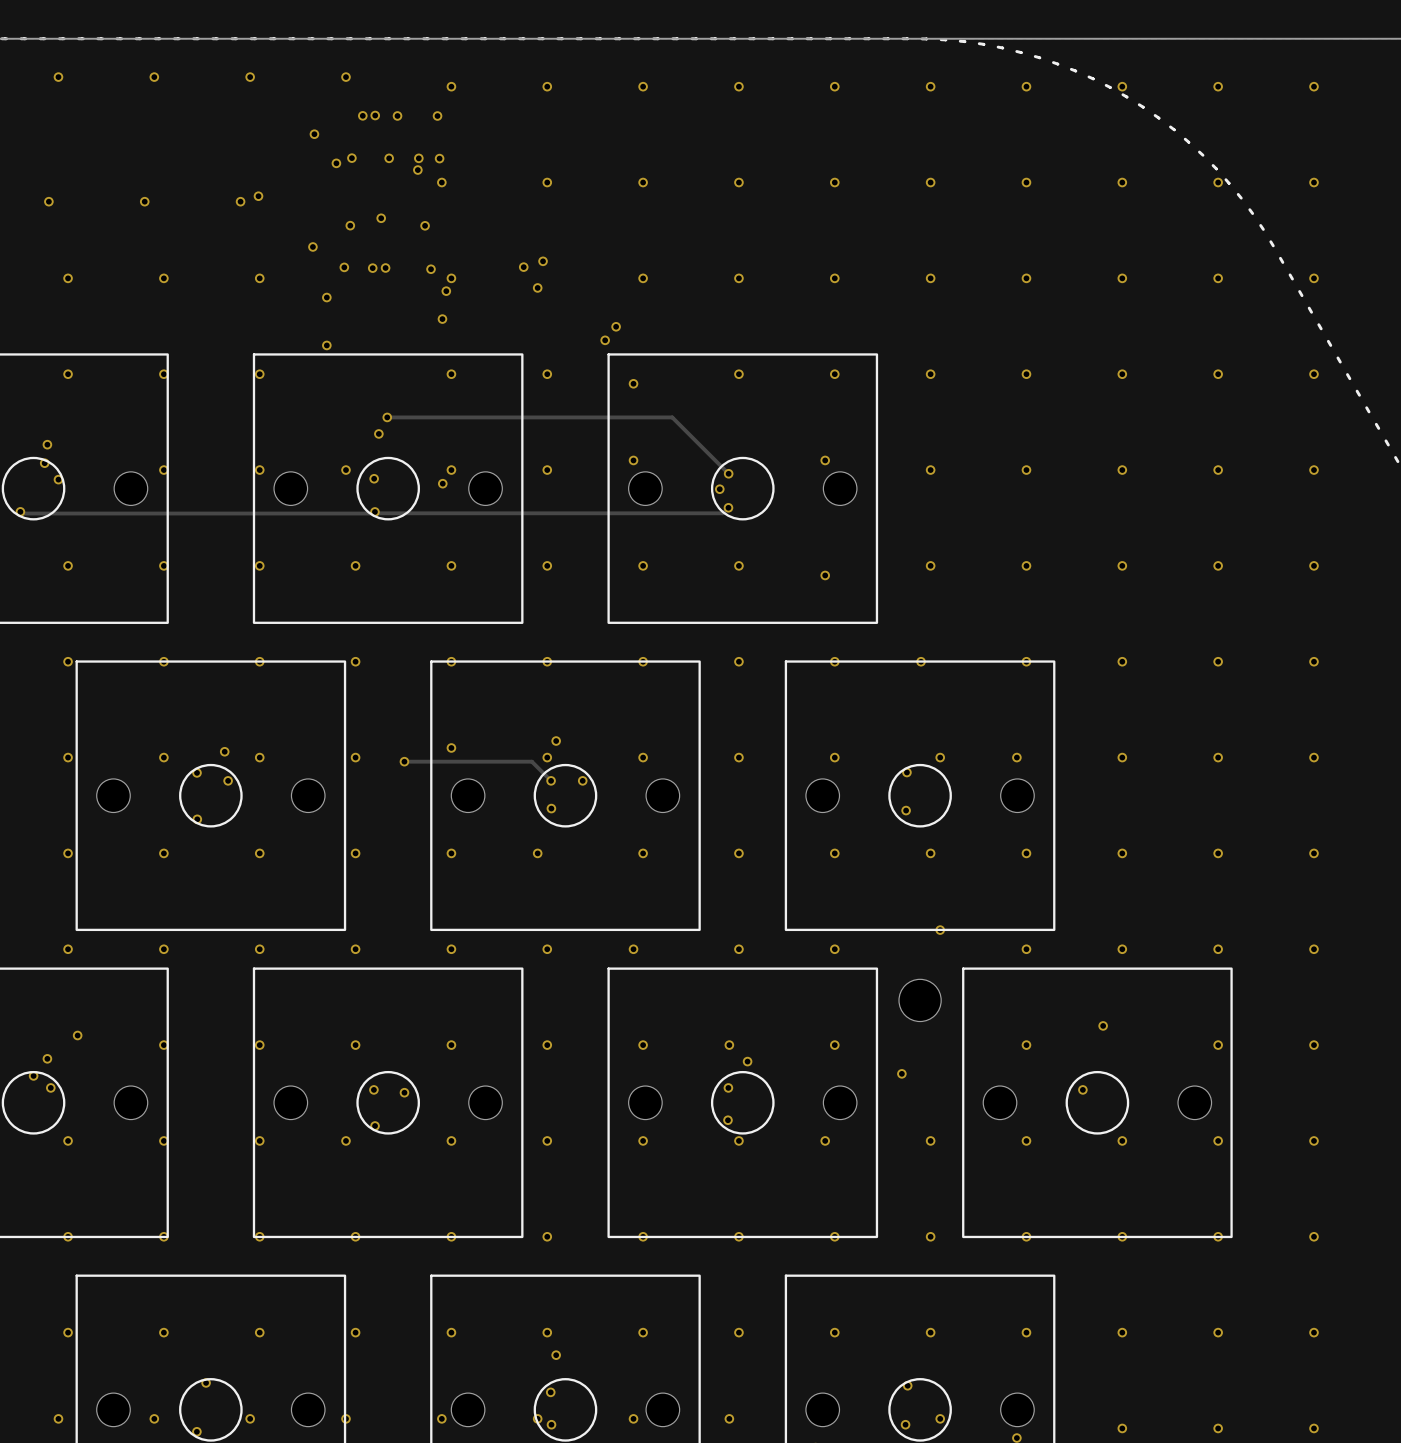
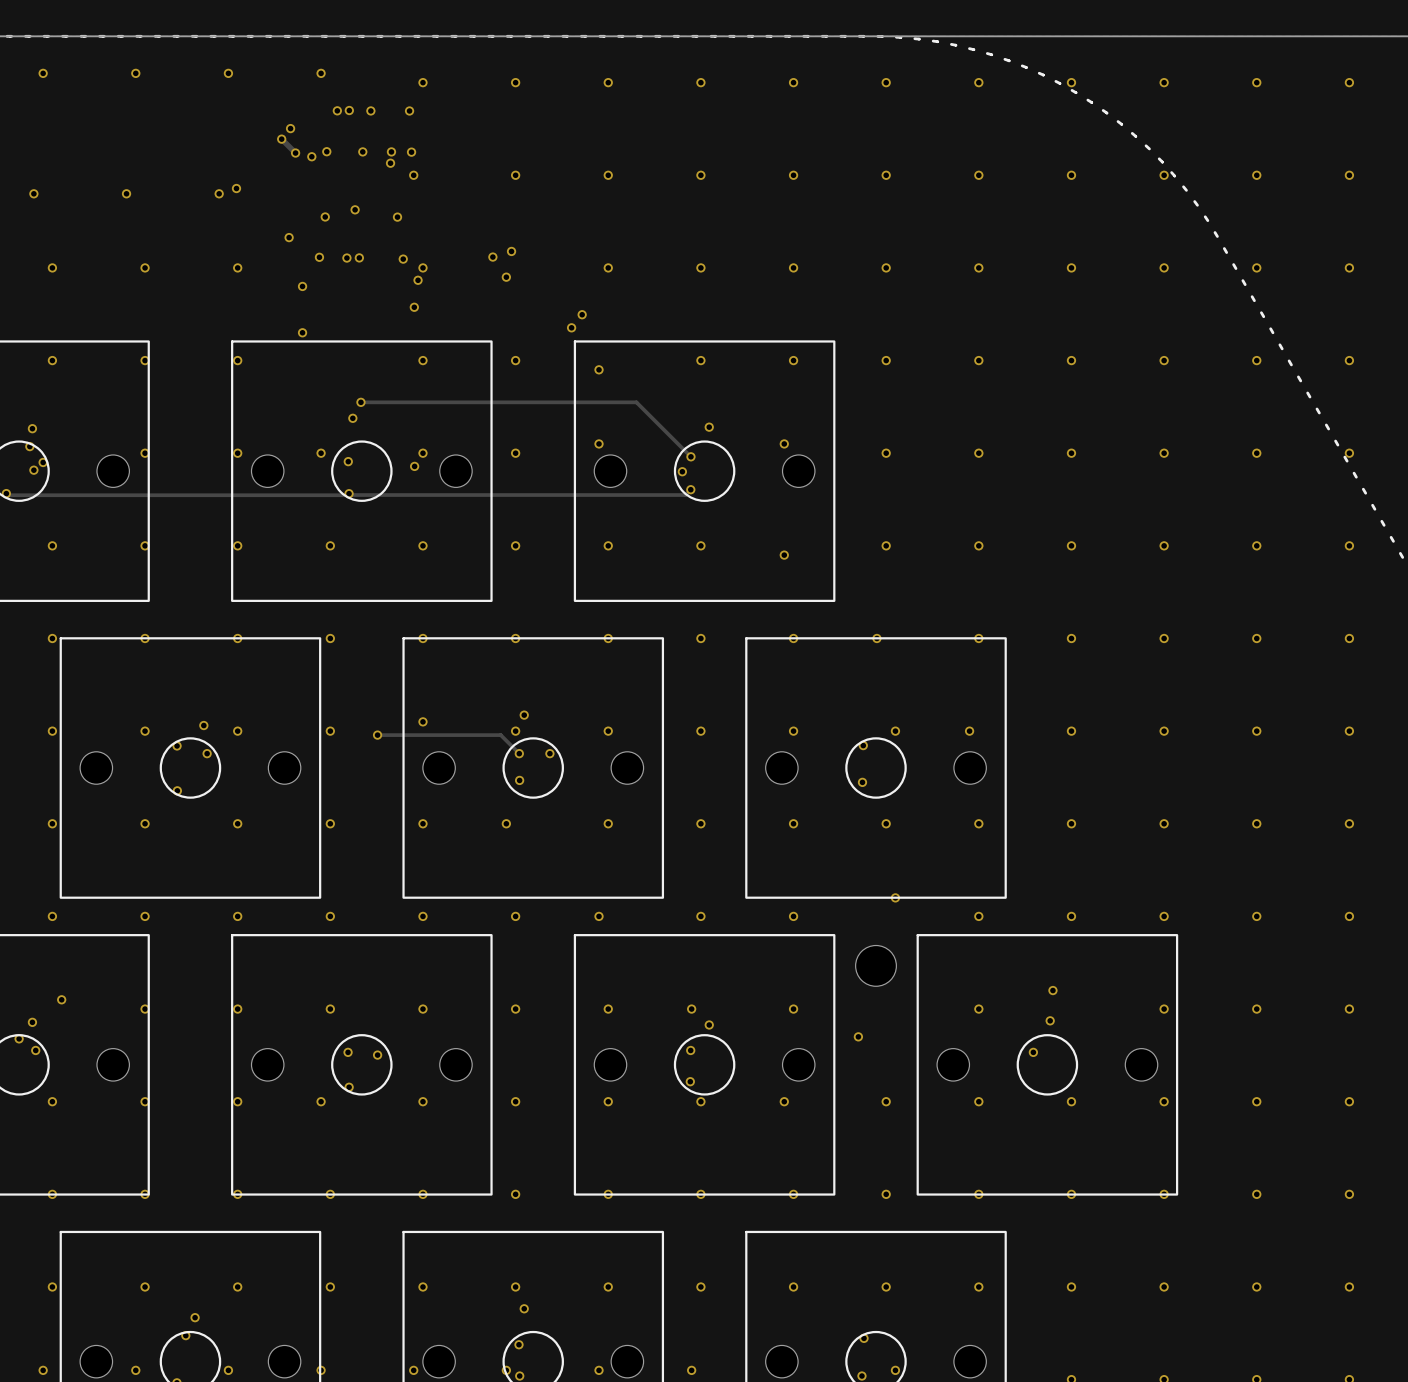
track: none -> (281, 139) (295, 153)
via: none -> (281, 139)
via: none -> (295, 153)
via: none -> (709, 427)
via: none -> (33, 470)
via: none -> (1050, 1020)
via: none -> (195, 1317)

